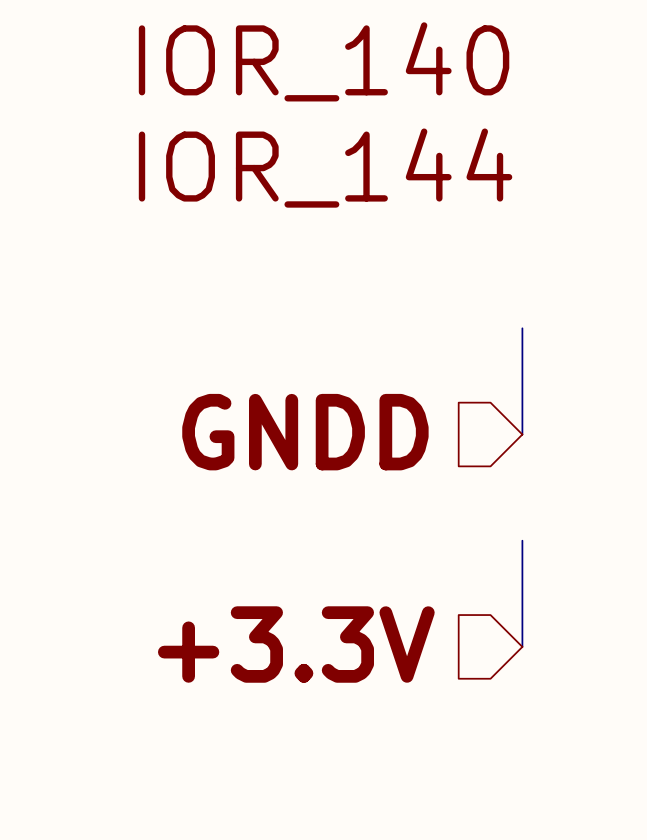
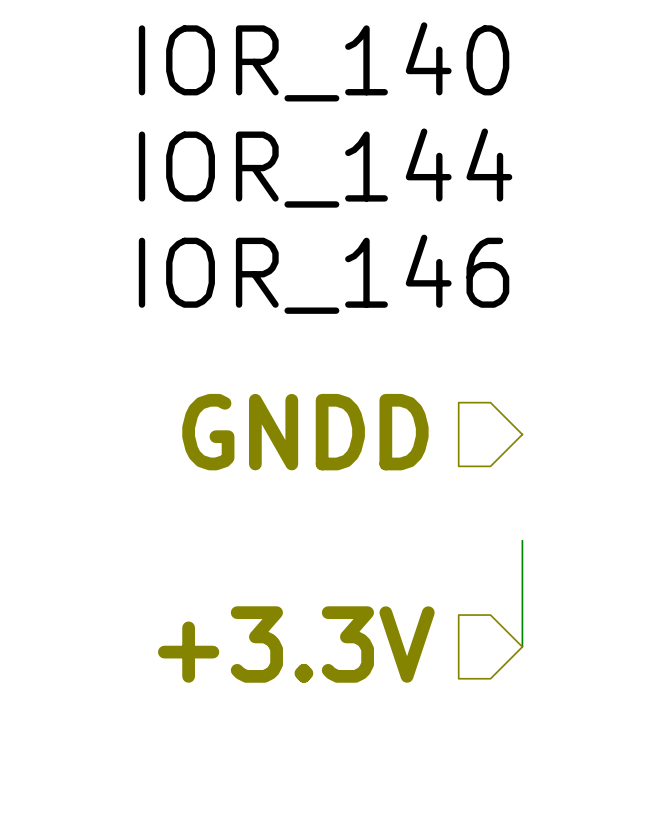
label: none -> IOR_146 (324, 274)
wire: (522, 328) (522, 434) -> none

